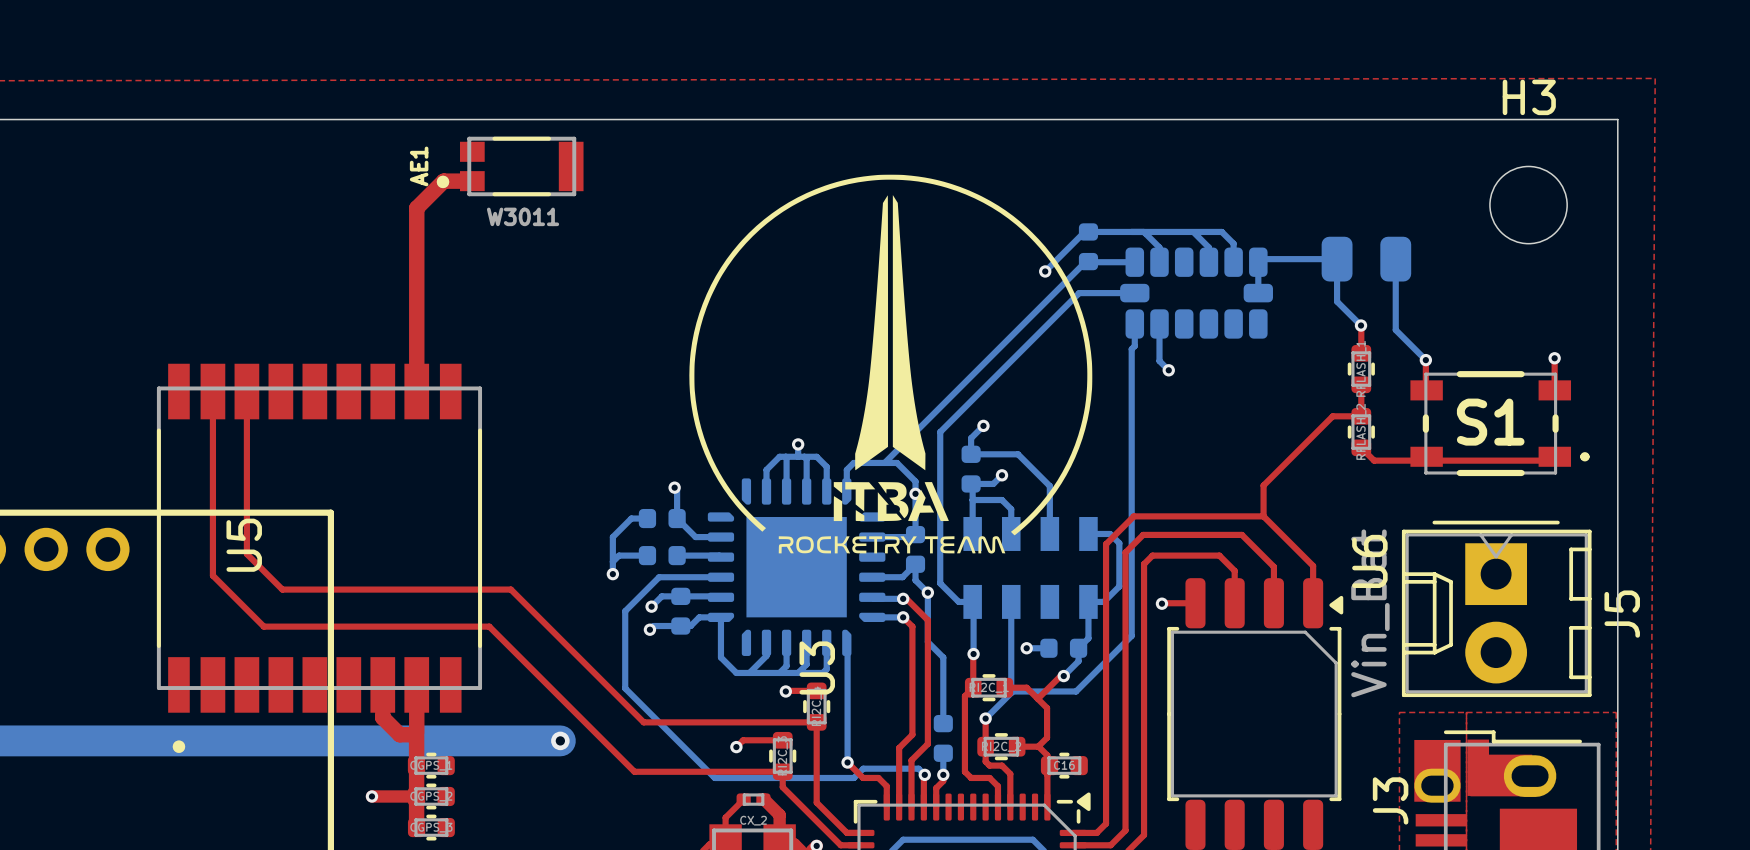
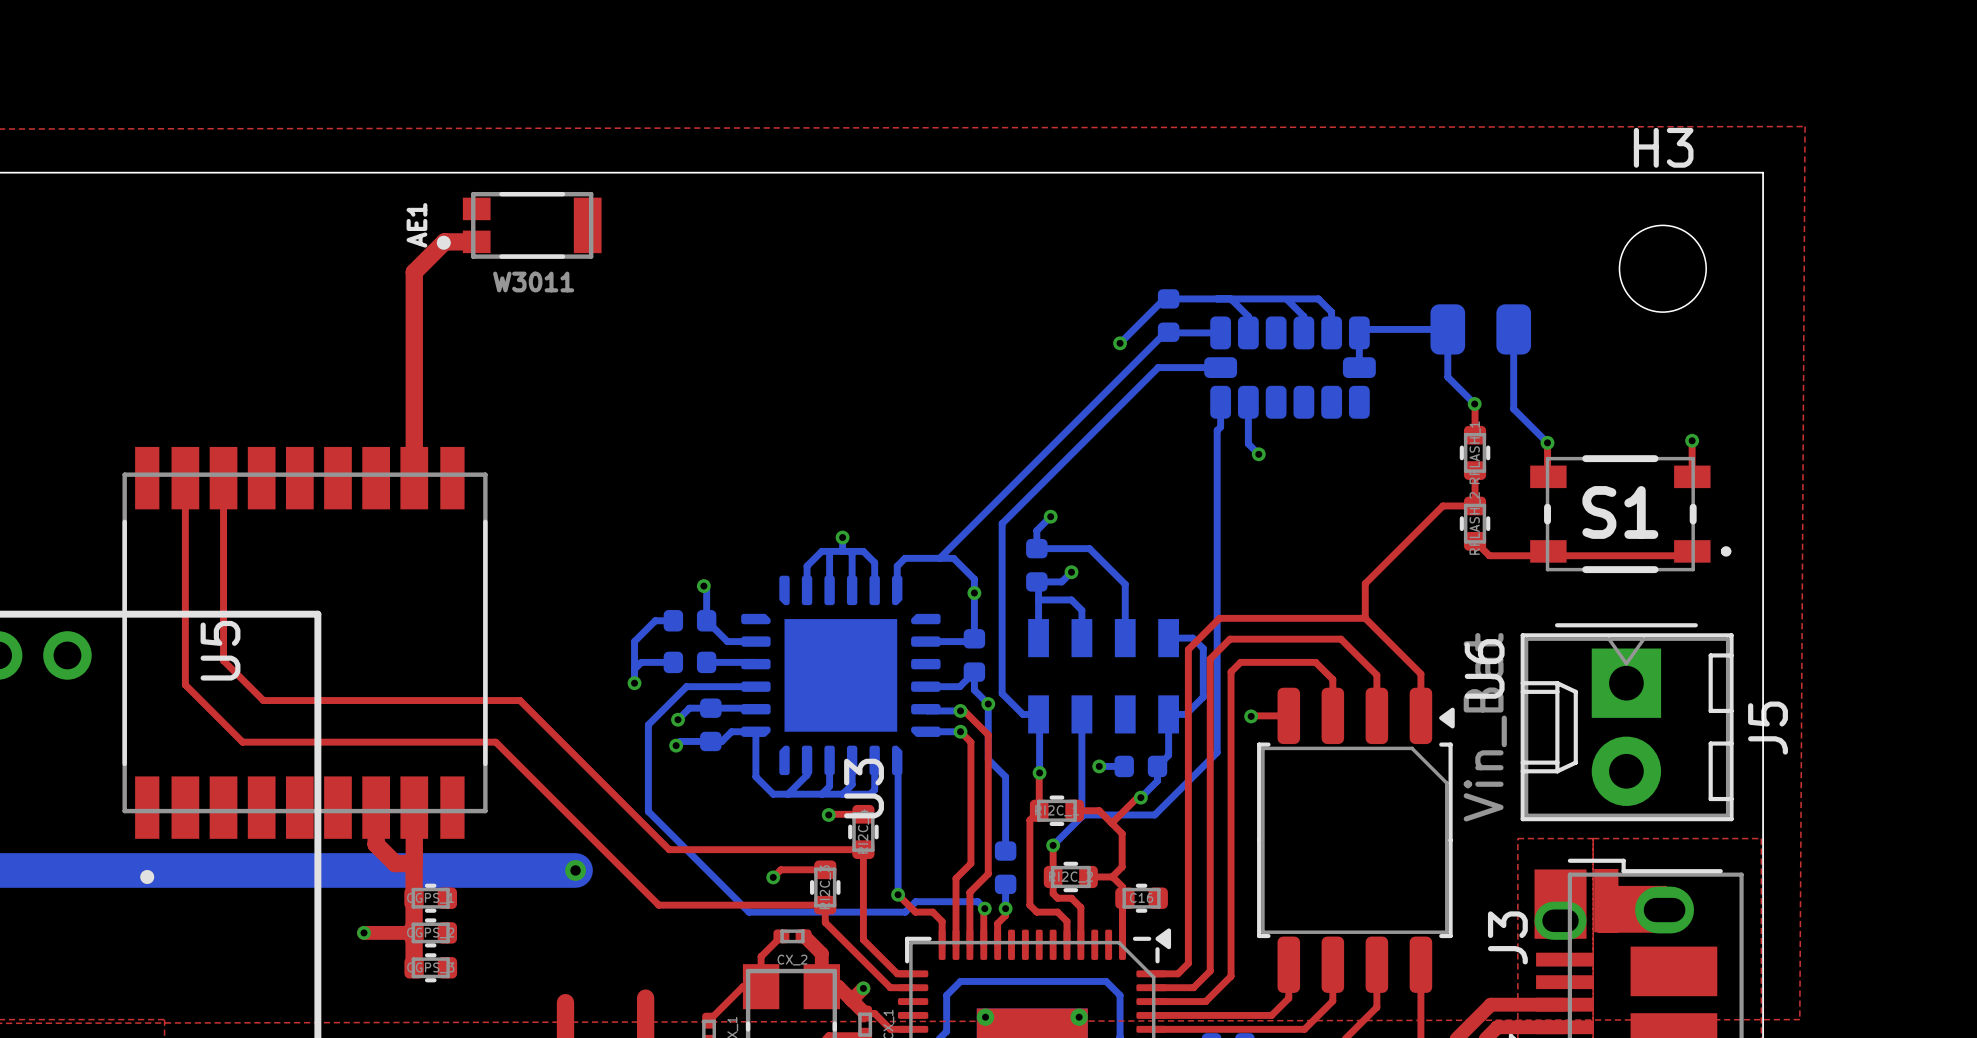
drawing: [689, 174, 1093, 554] -> none

